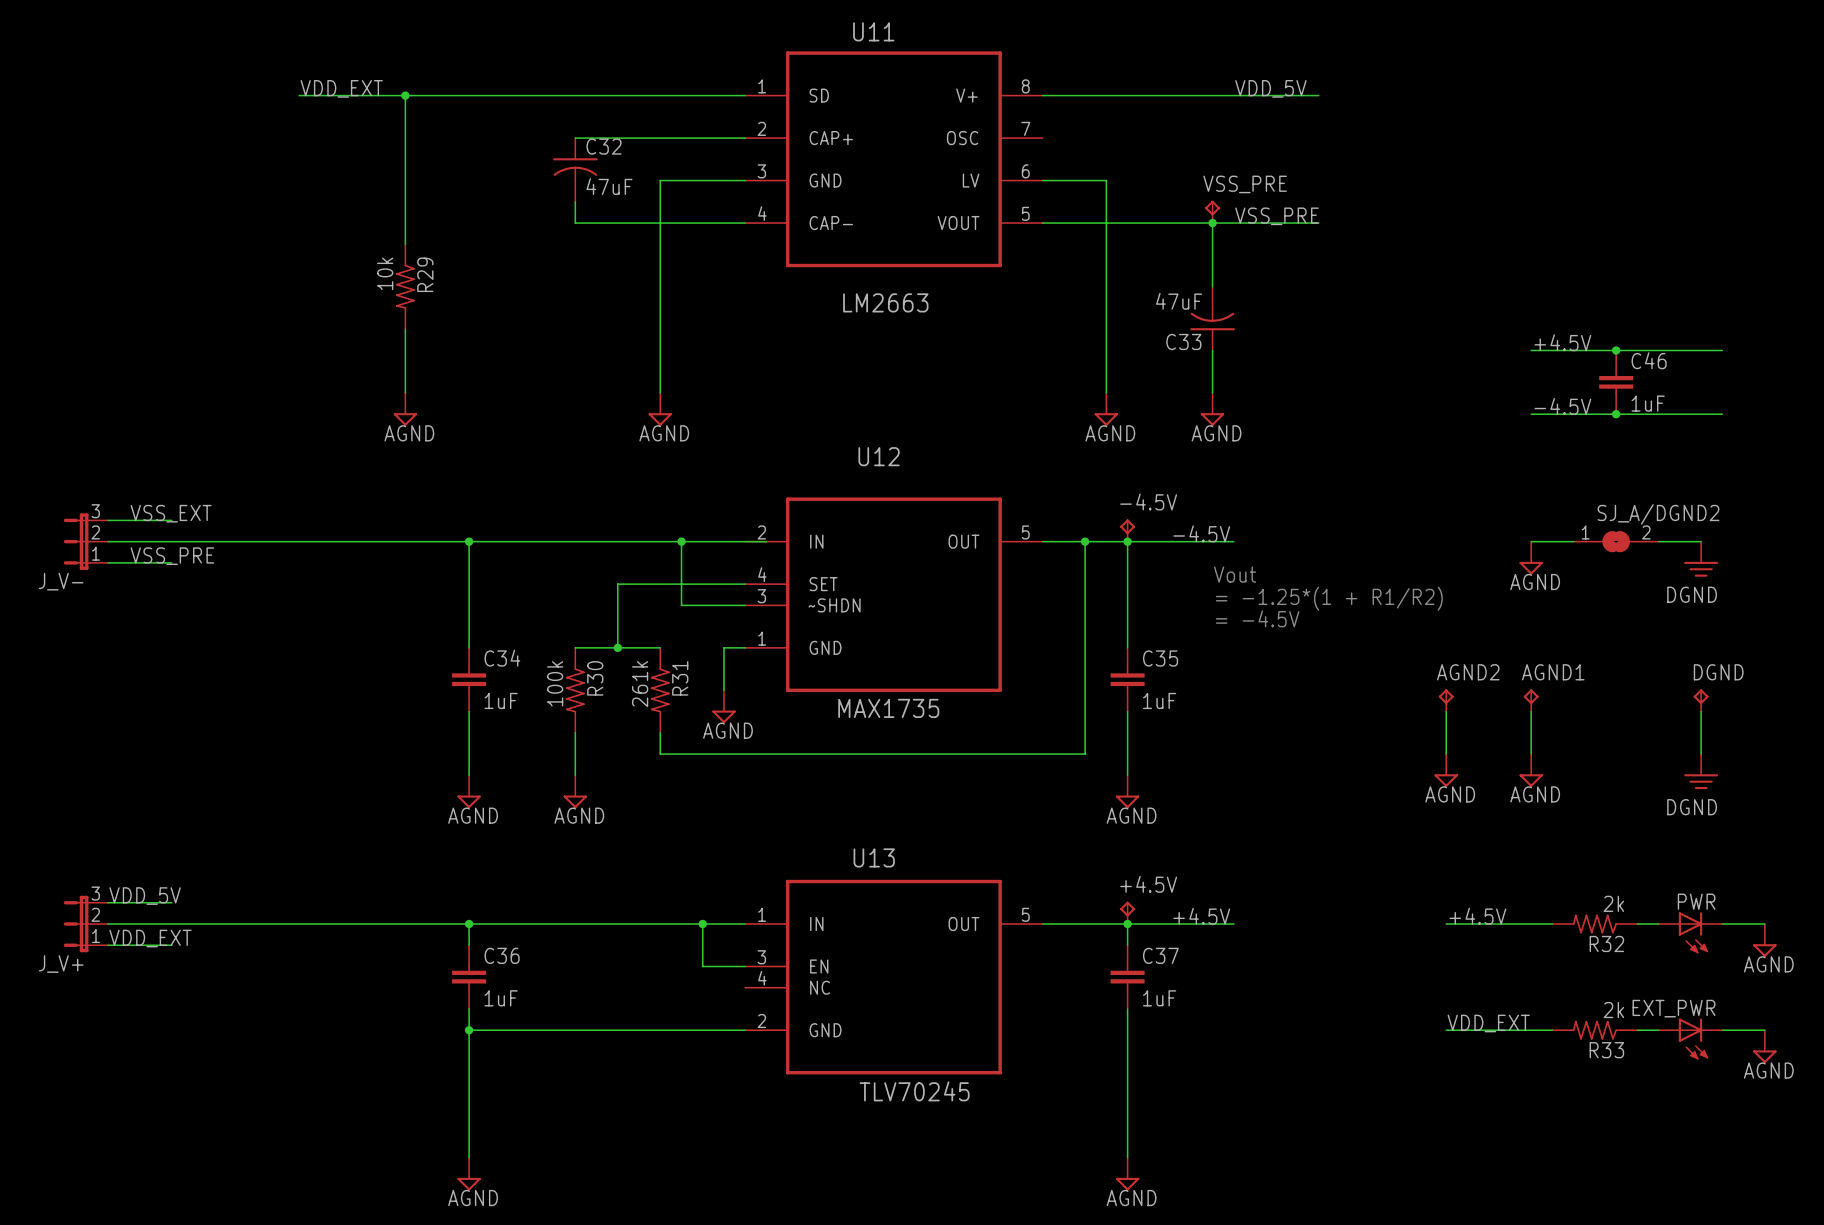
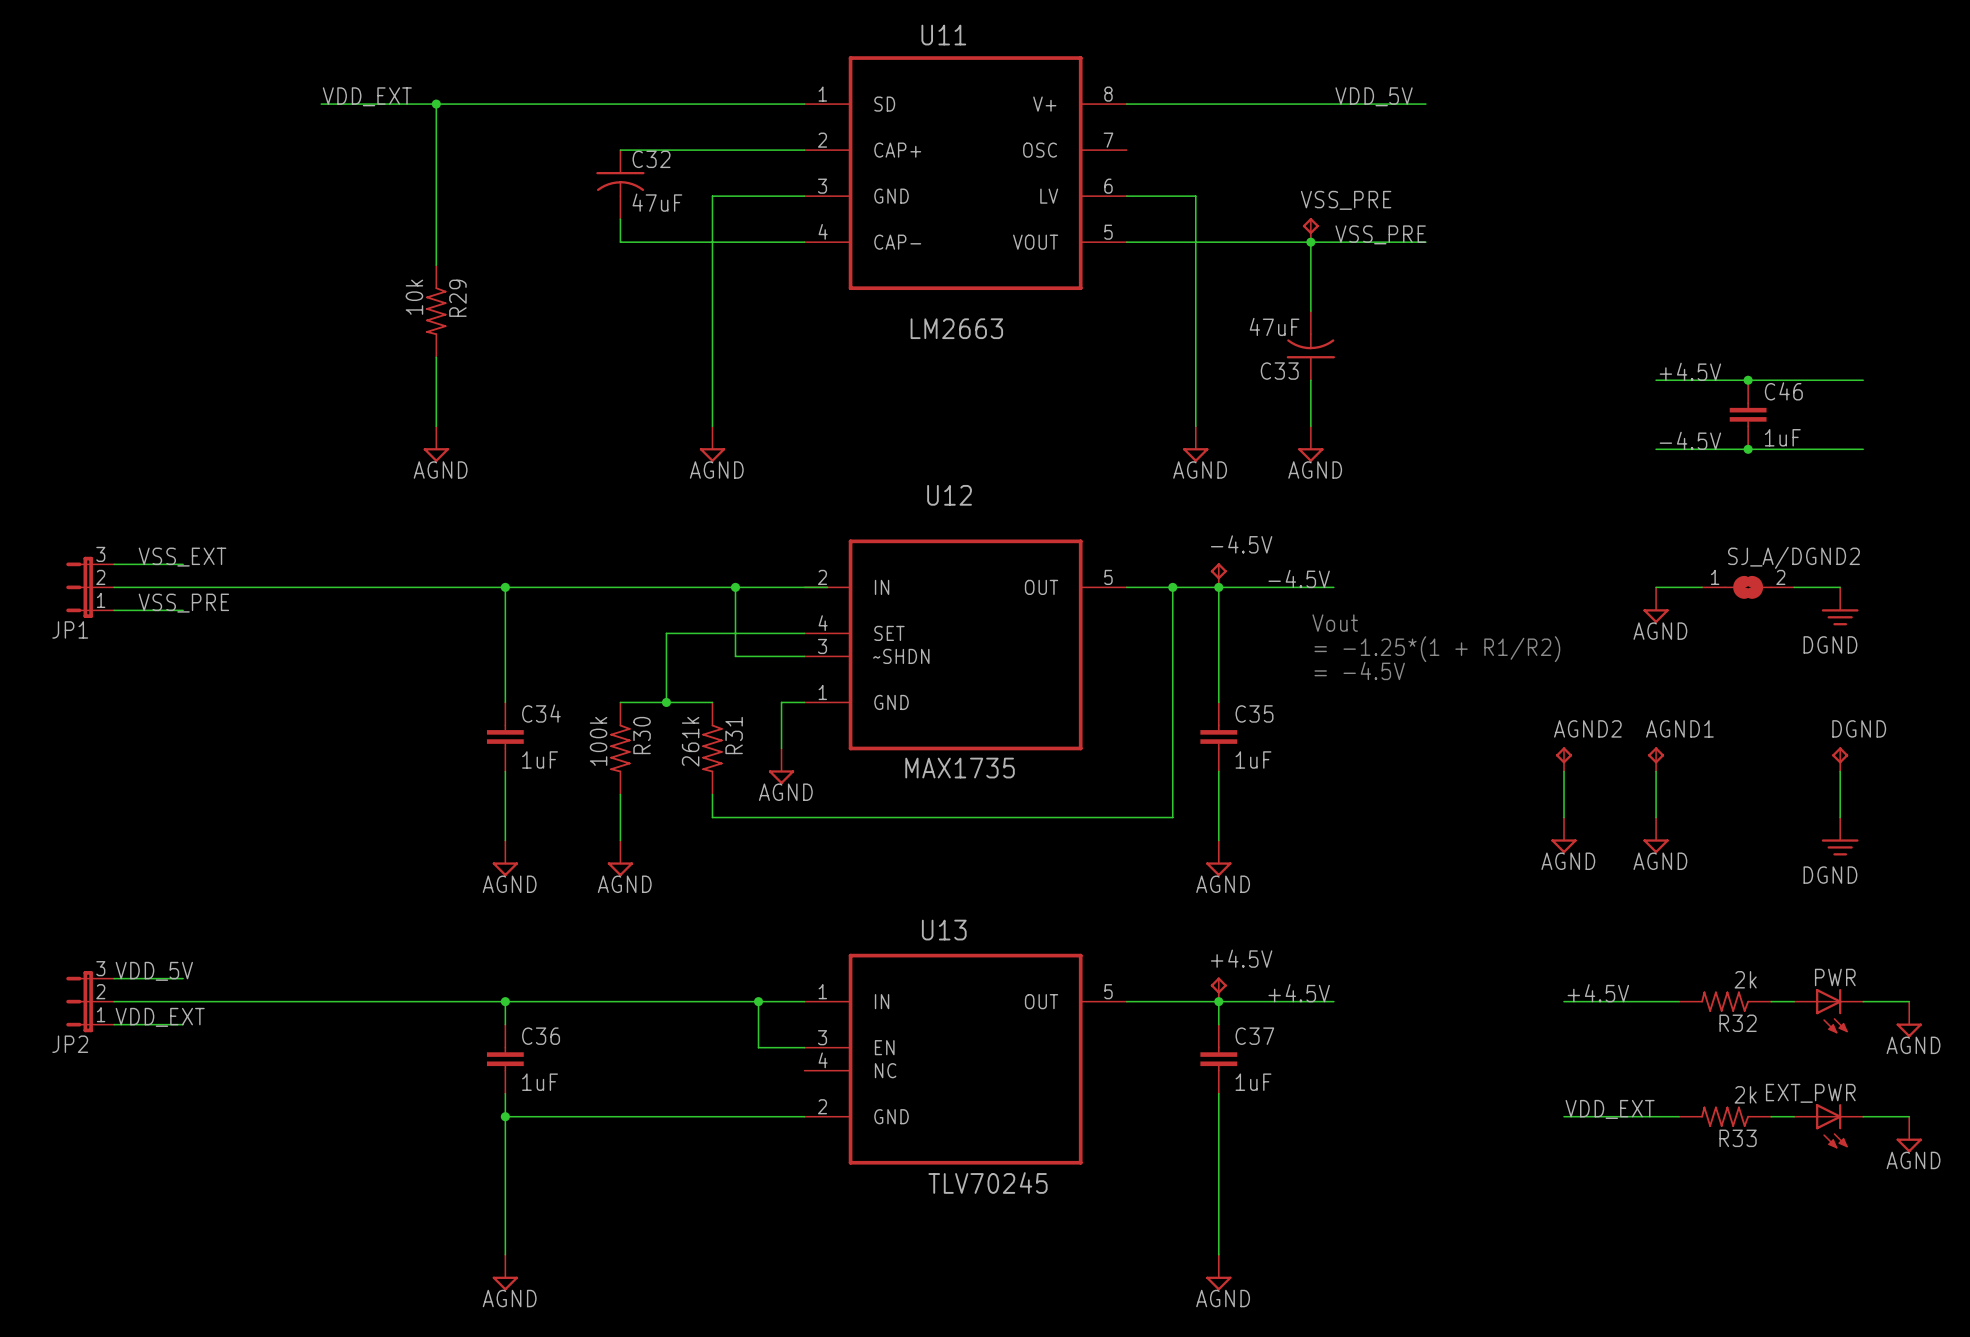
J_V- name: J_V- (61, 581) -> JP1 (70, 629)
J_V+ name: J_V+ (61, 964) -> JP2 (70, 1044)

